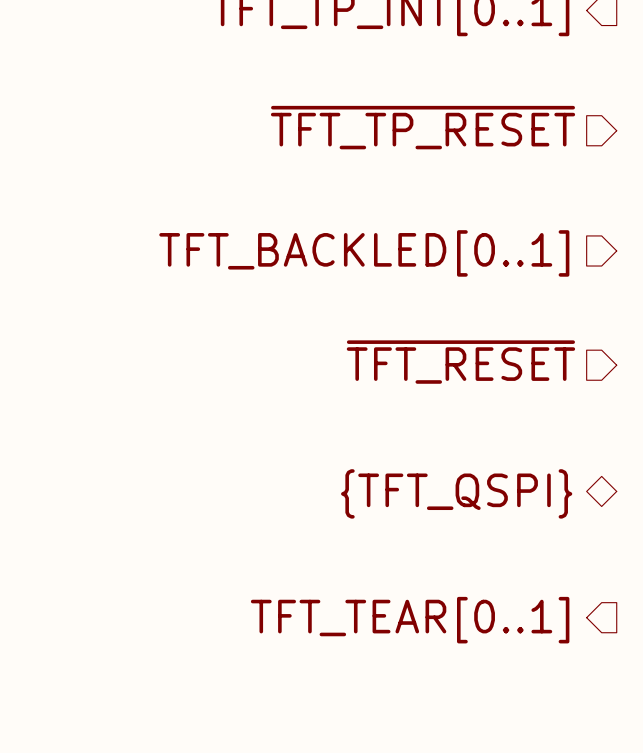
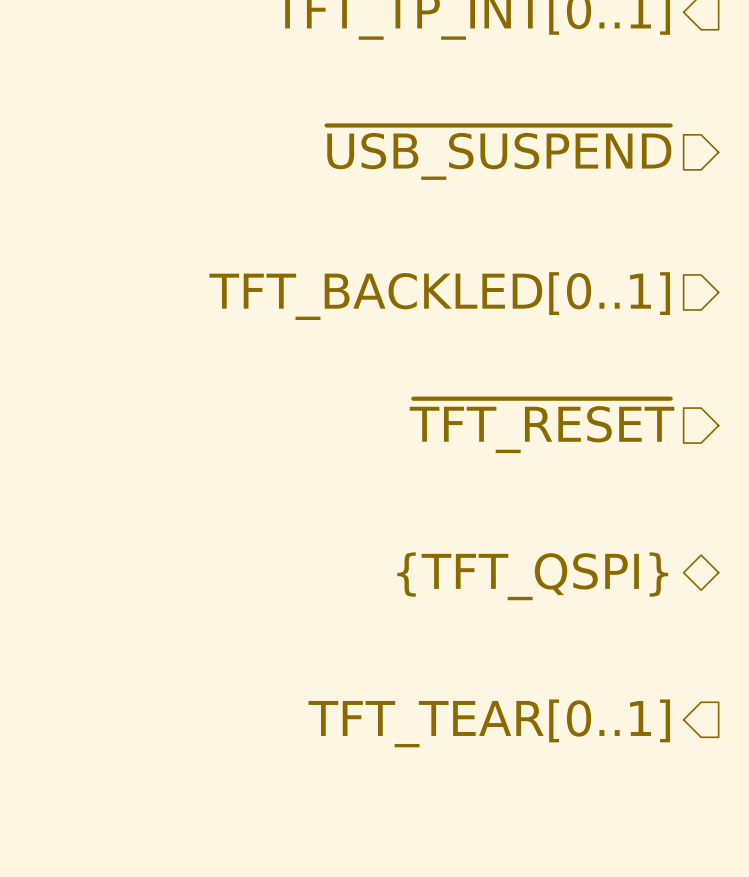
hierarchical label: ~{TFT_TP_RESET} (423, 127) -> ~{USB_SUSPEND} (498, 152)

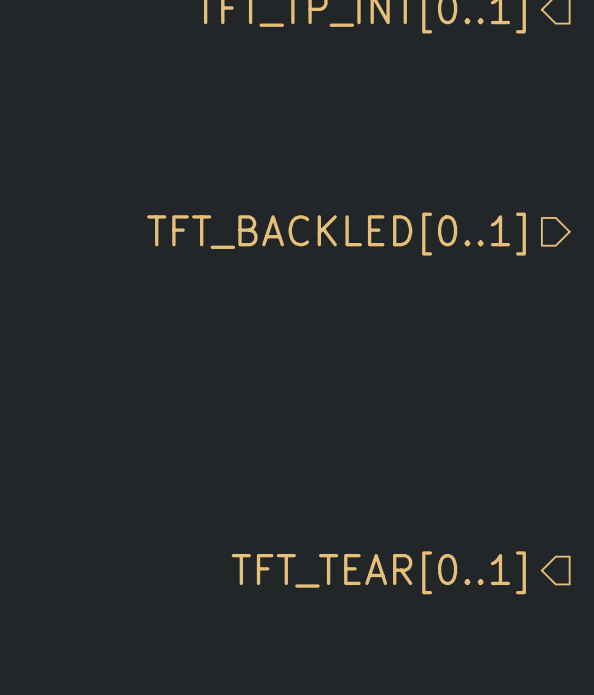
hierarchical label: ~{USB_SUSPEND} (498, 152) -> none
hierarchical label: ~{TFT_RESET} (542, 425) -> none
hierarchical label: {TFT_QSPI} (532, 576) -> none

